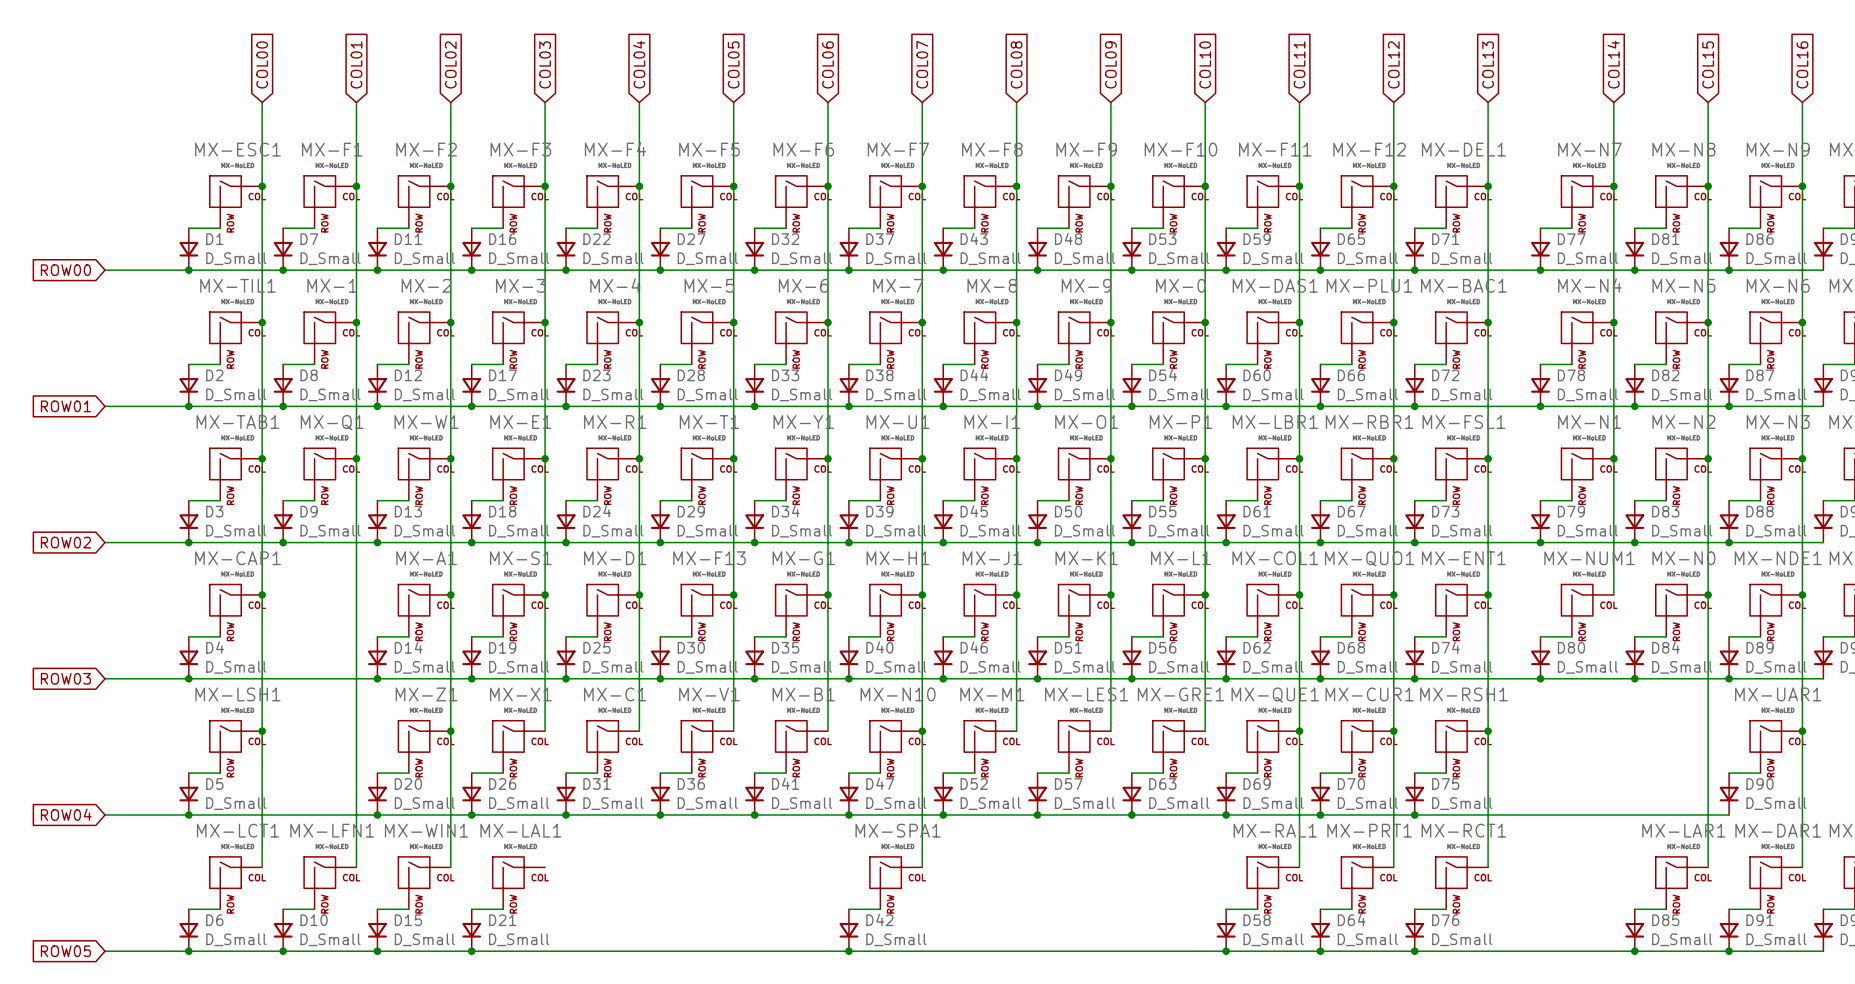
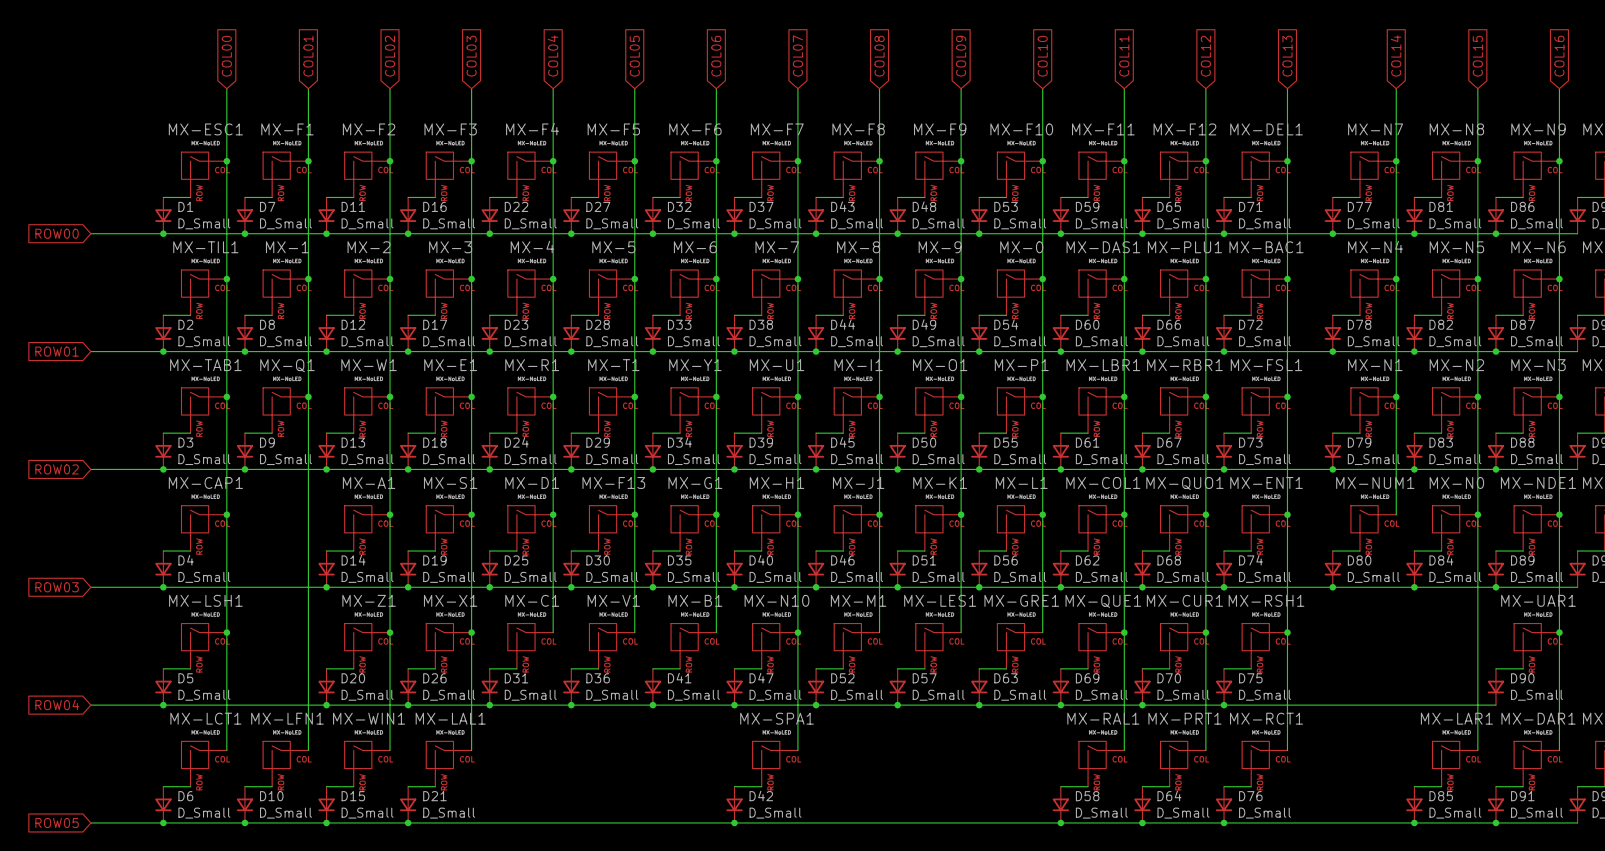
wire: none -> (471, 632) (471, 750)
junction: none -> (471, 632)

